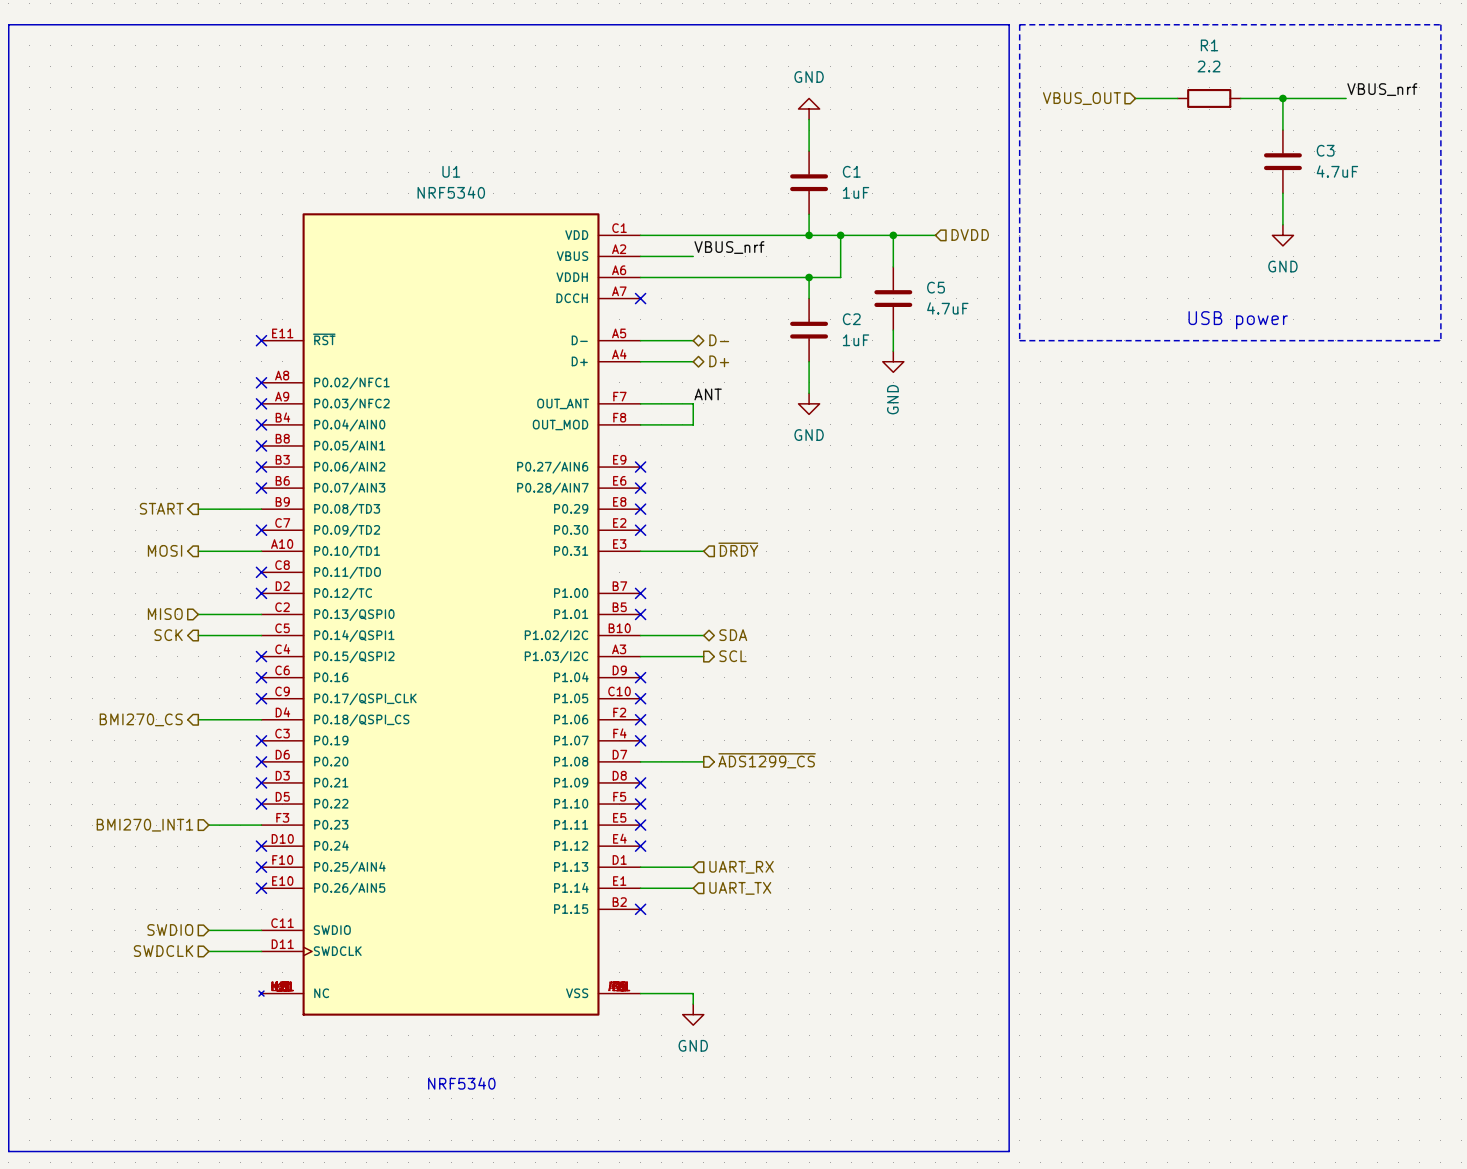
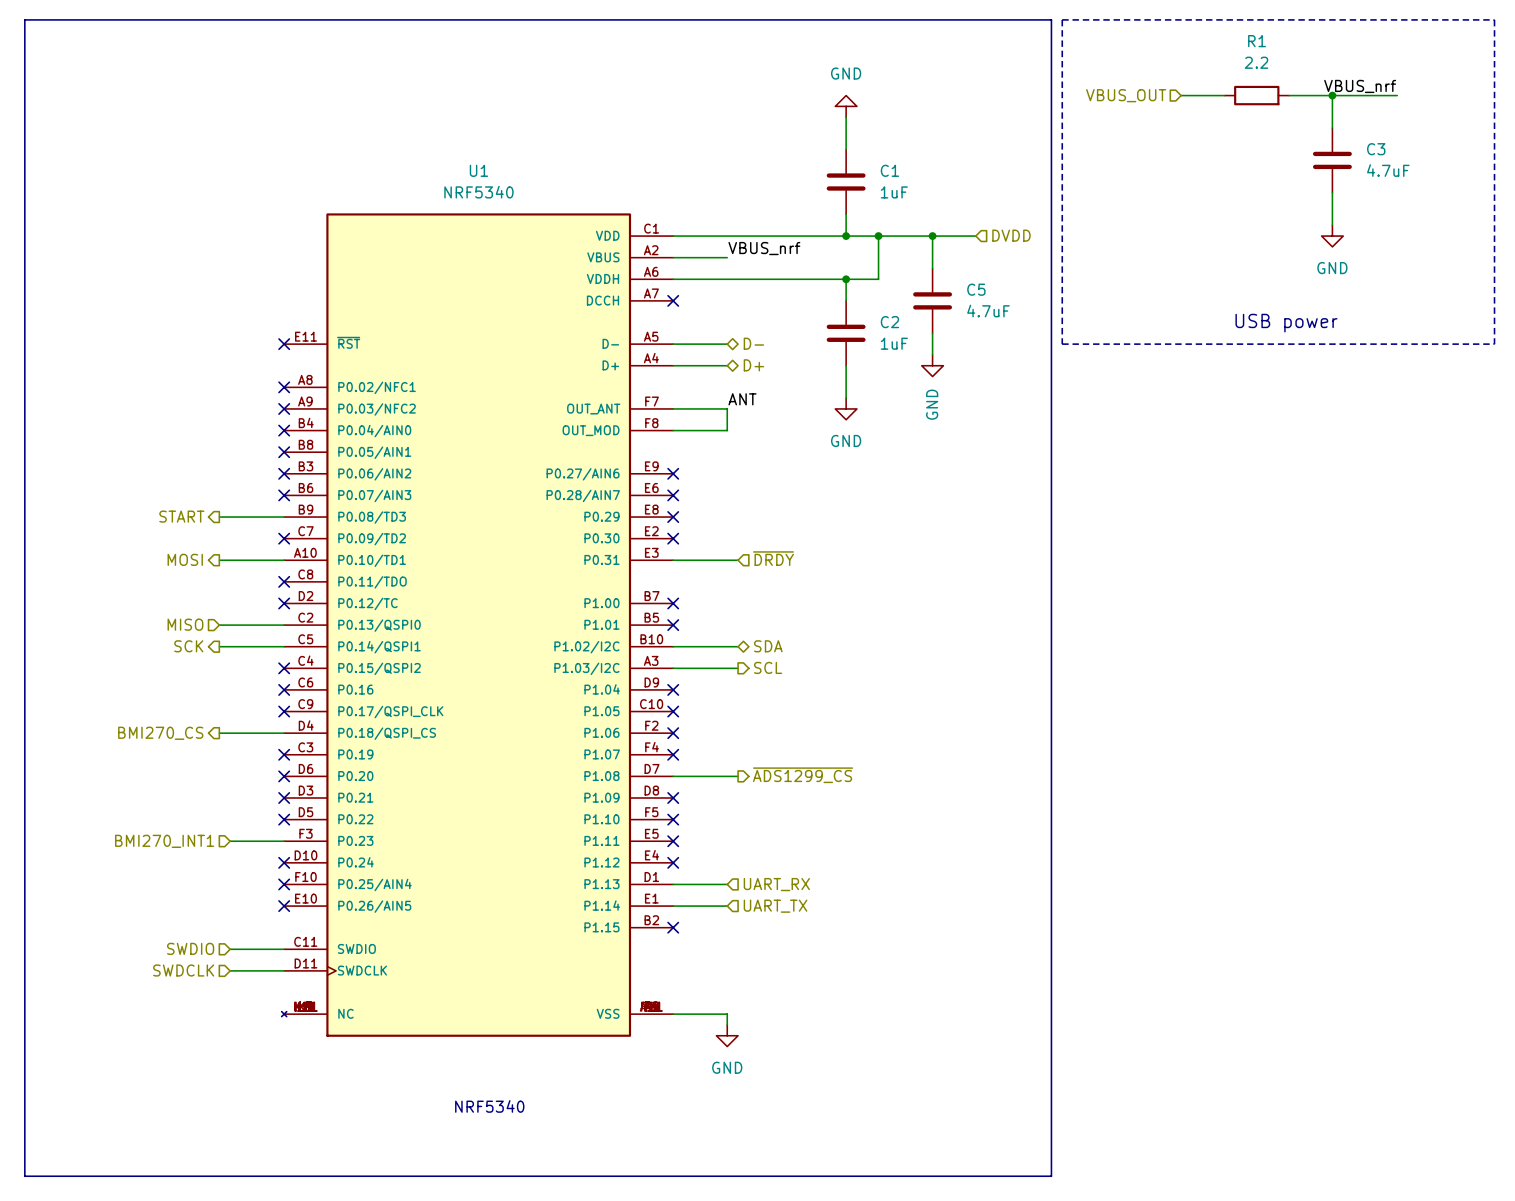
label position: VBUS_nrf (1382, 89) -> VBUS_nrf (1360, 86)

